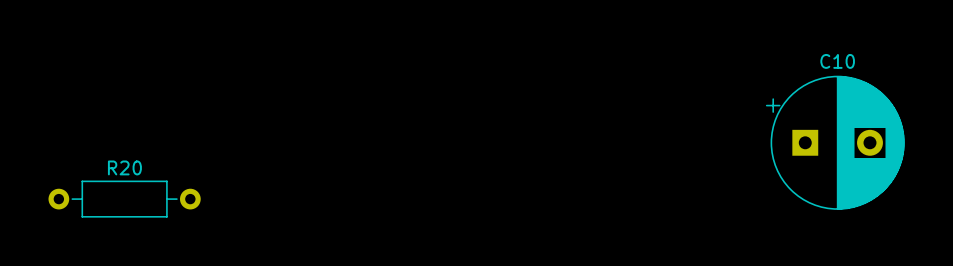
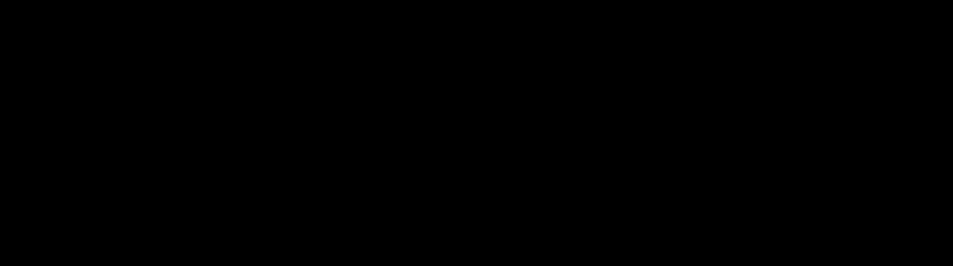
C10: (835, 142) -> none
R20: (124, 199) -> none

